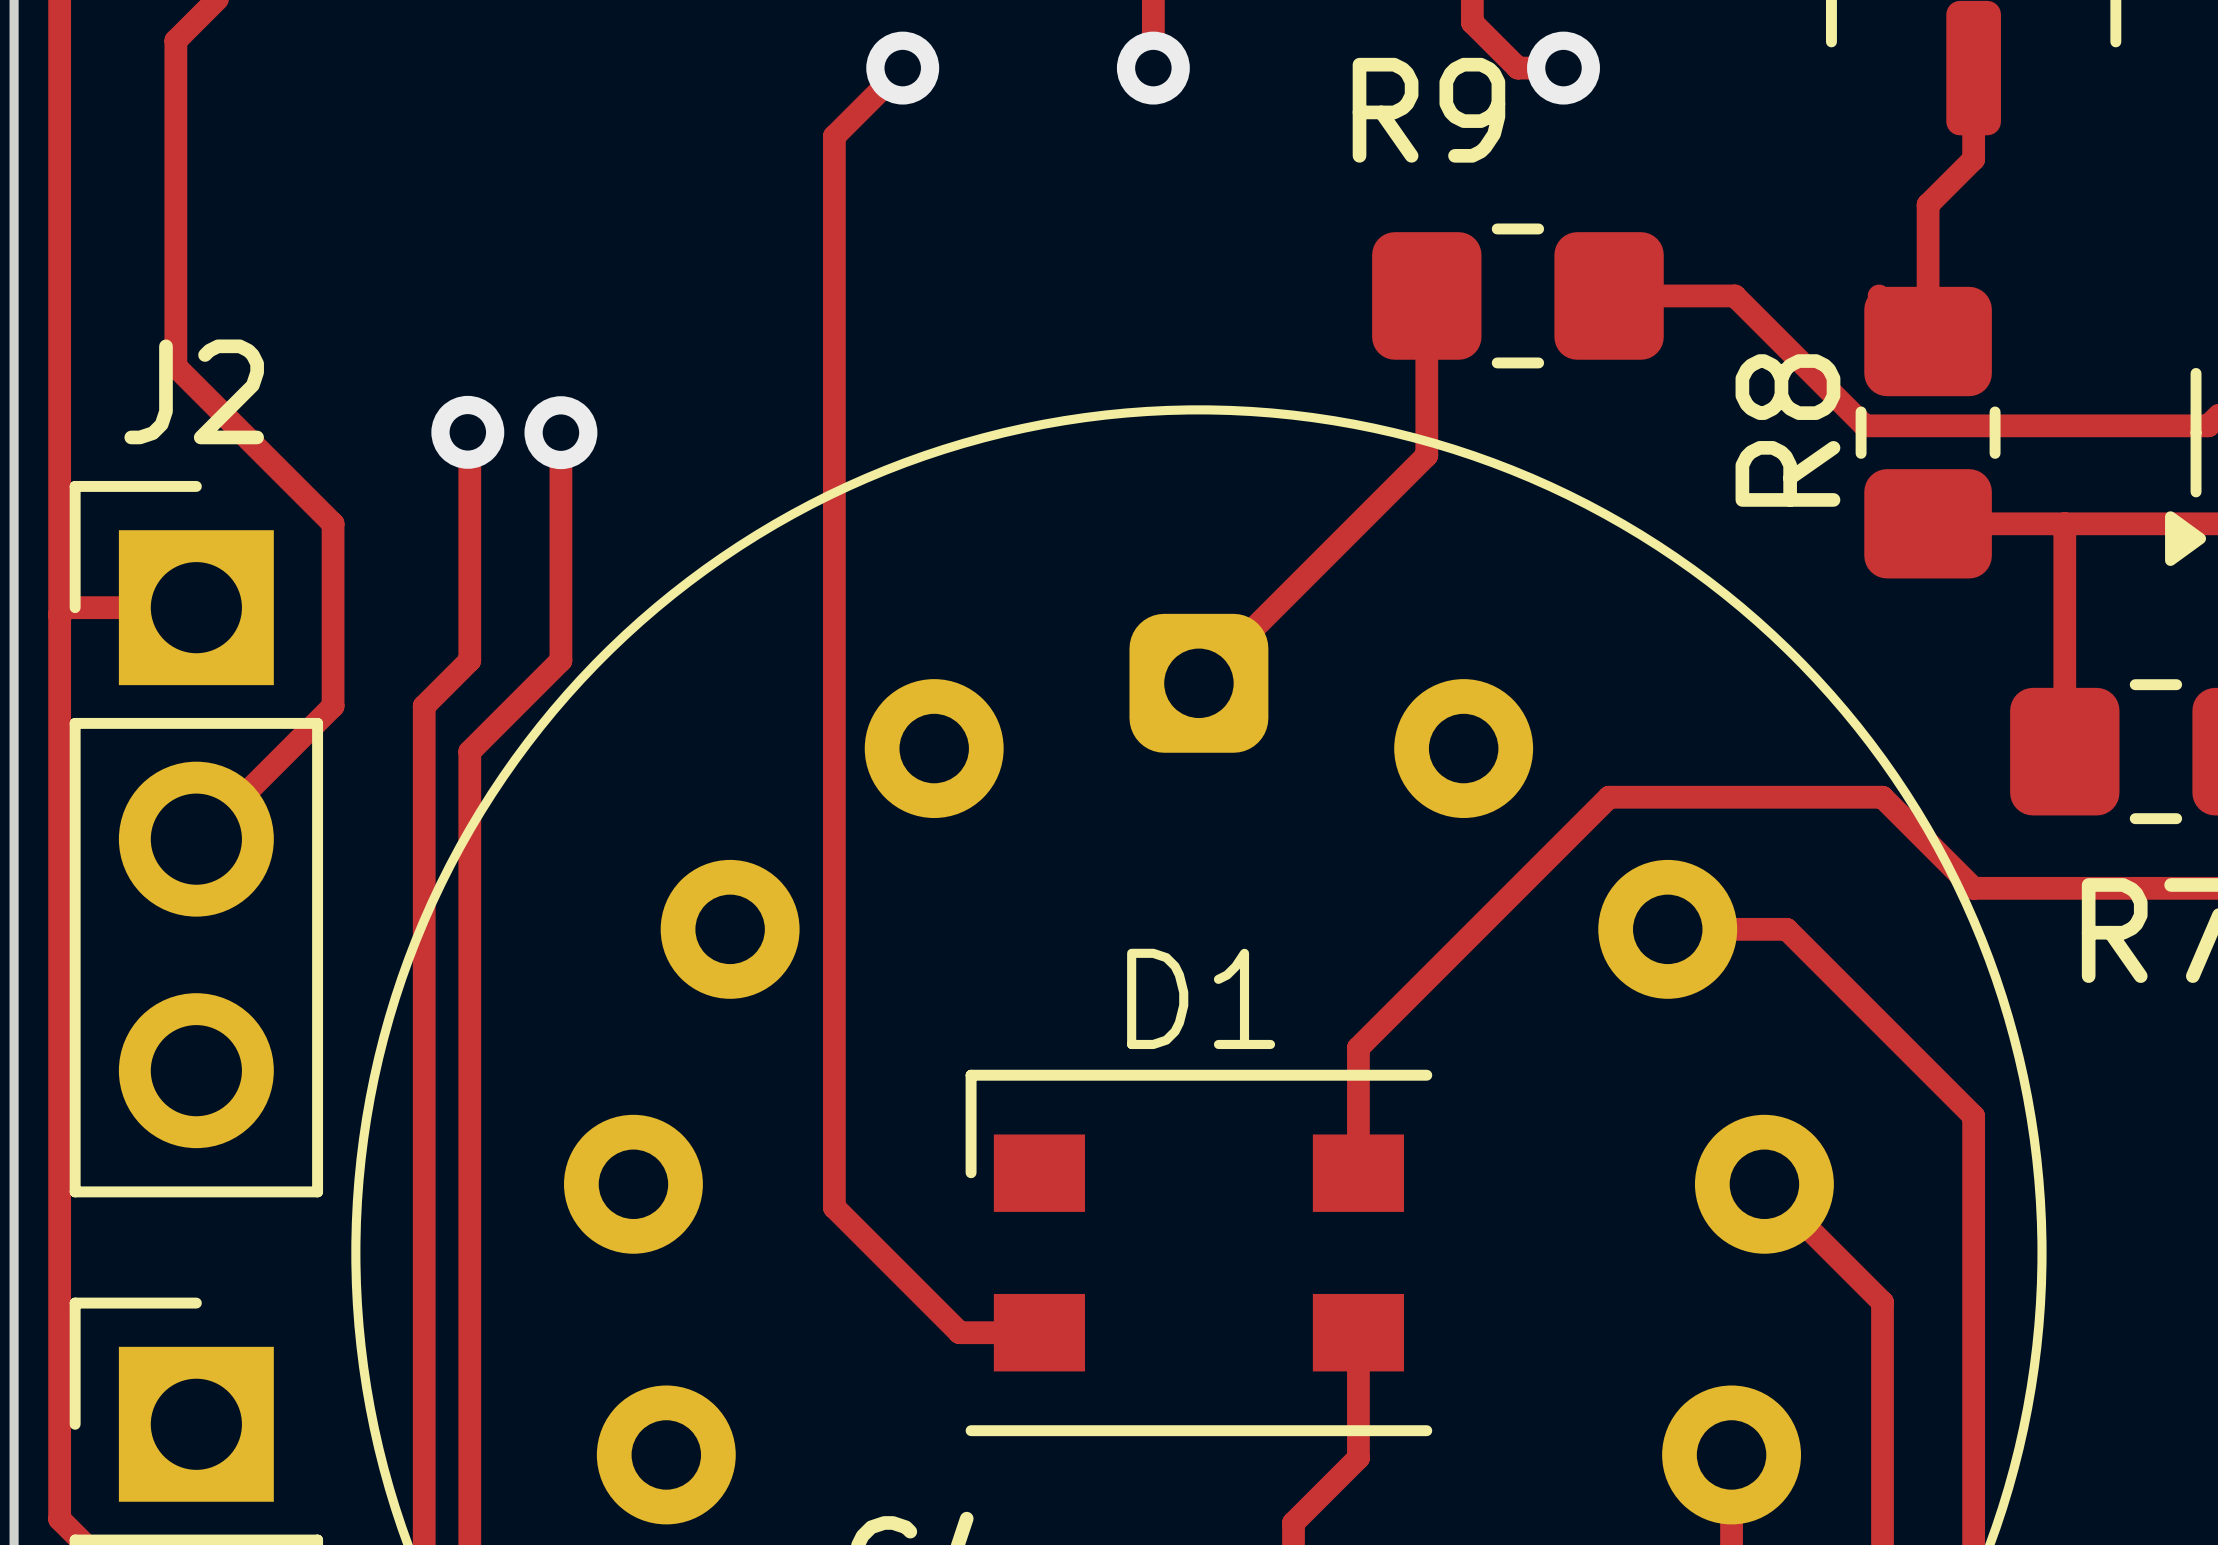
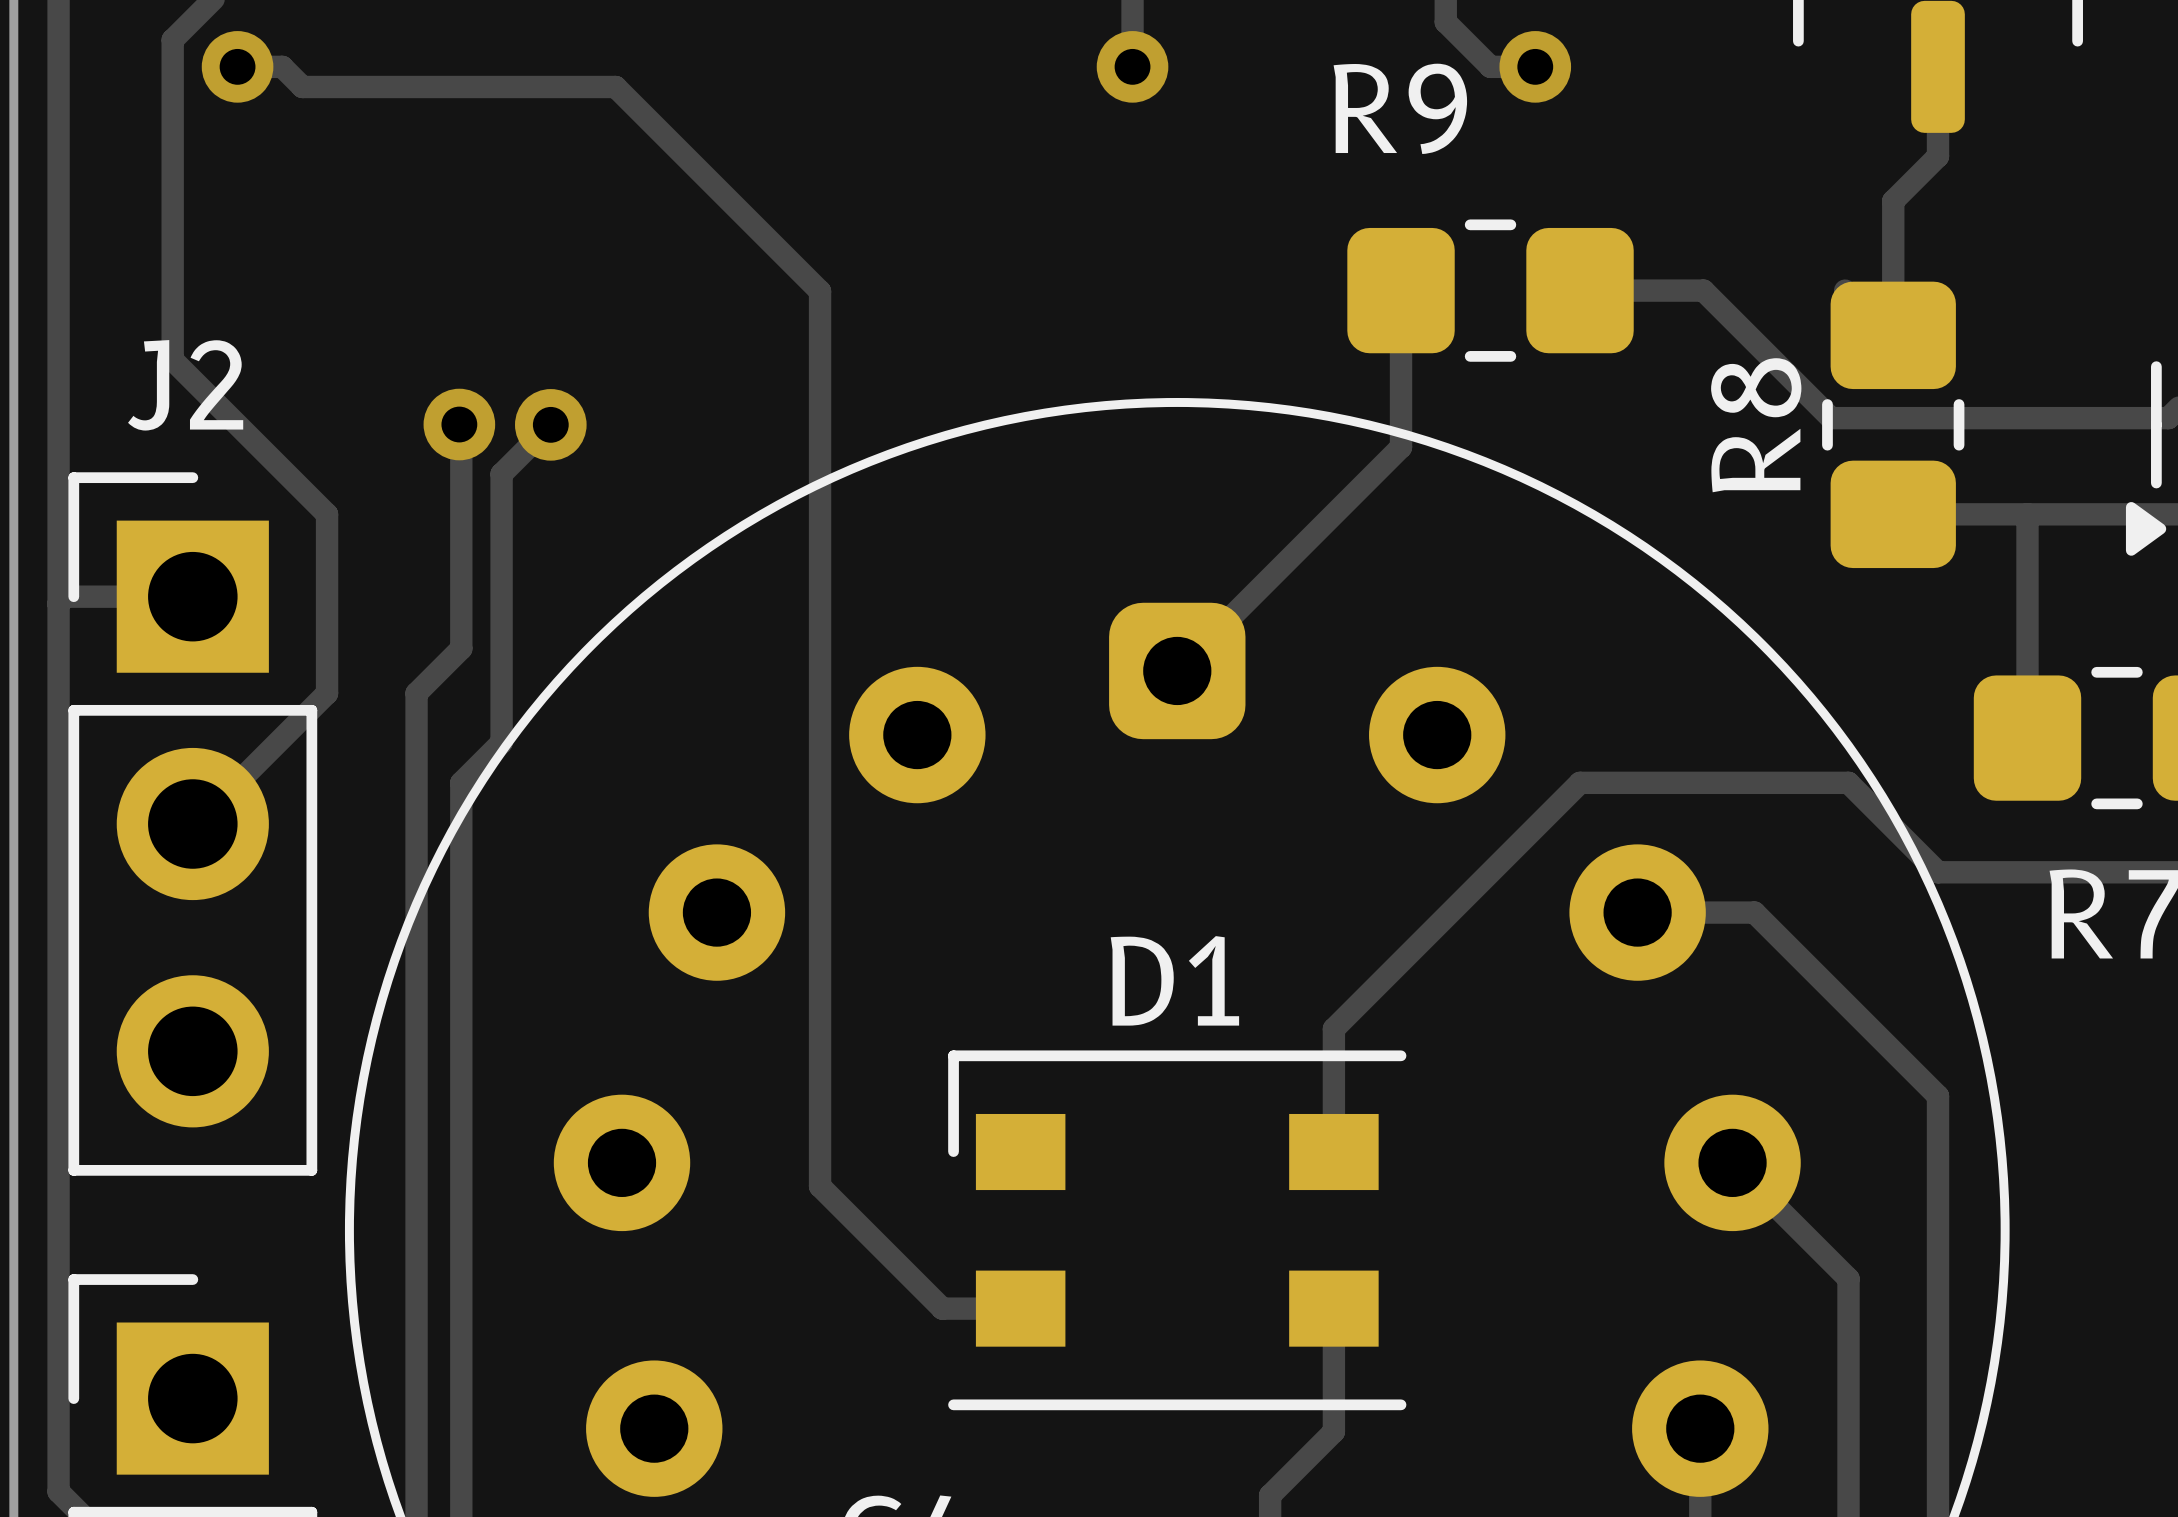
via: none -> (237, 66)
track: (902, 68) (834, 136) (834, 1207) -> (237, 66) (282, 66) (302, 87) (615, 87) (820, 291) (820, 1186)
via: (902, 68) -> none
track: (560, 432) (560, 660) (469, 751) (469, 797) -> (550, 424) (501, 474) (501, 742) (461, 782)

